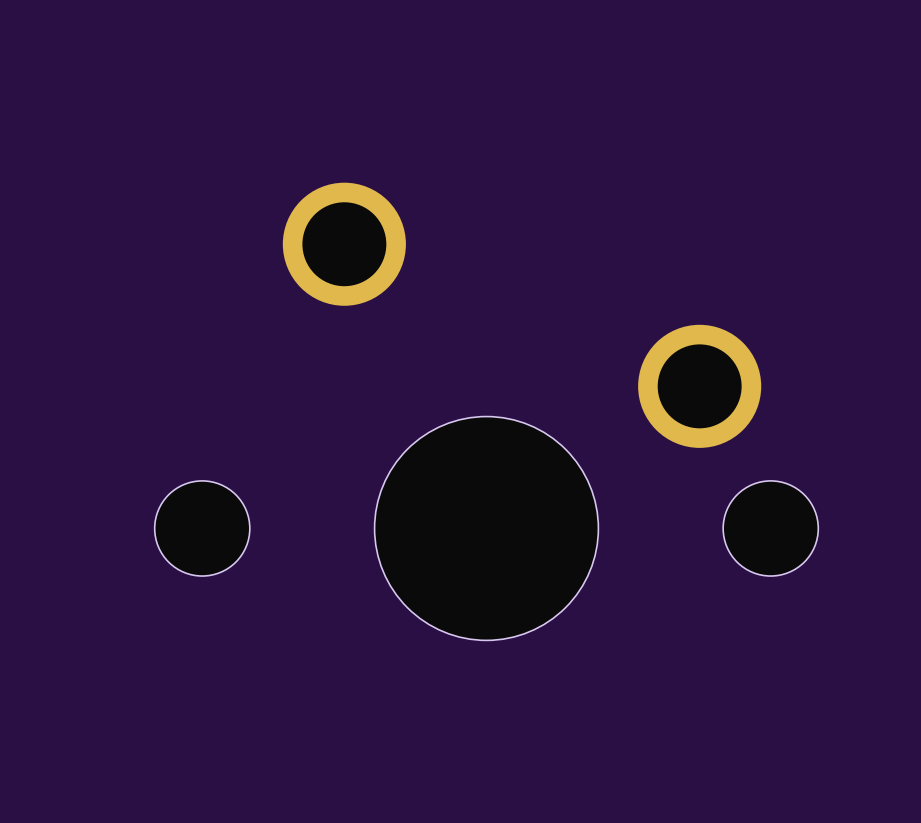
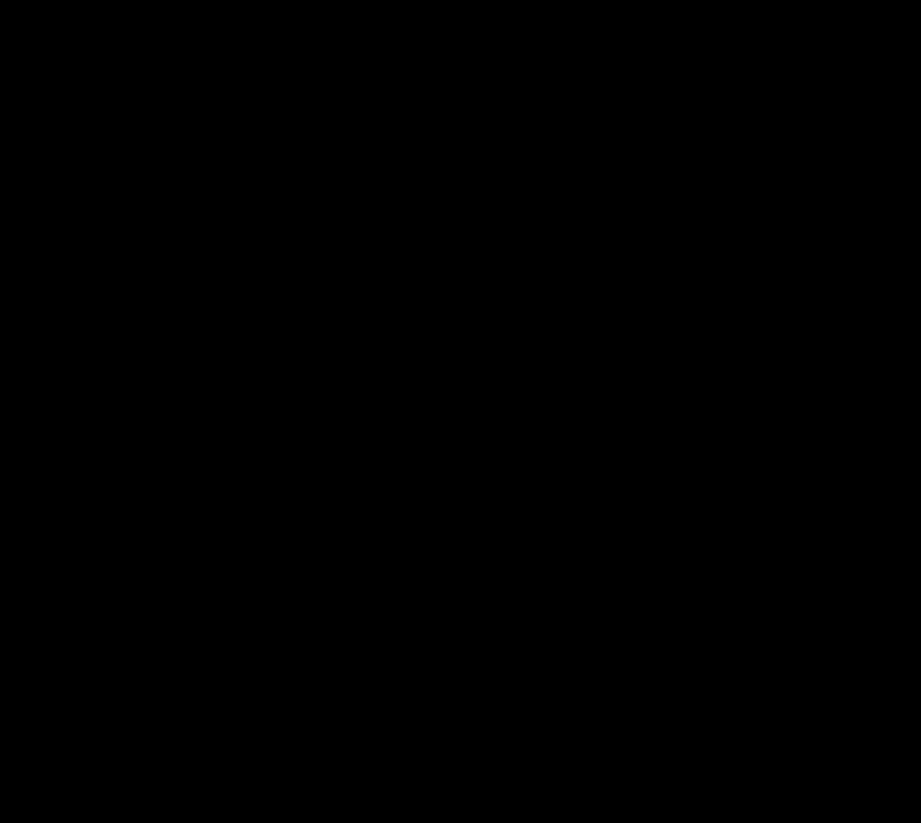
part: (486, 411) -> none

